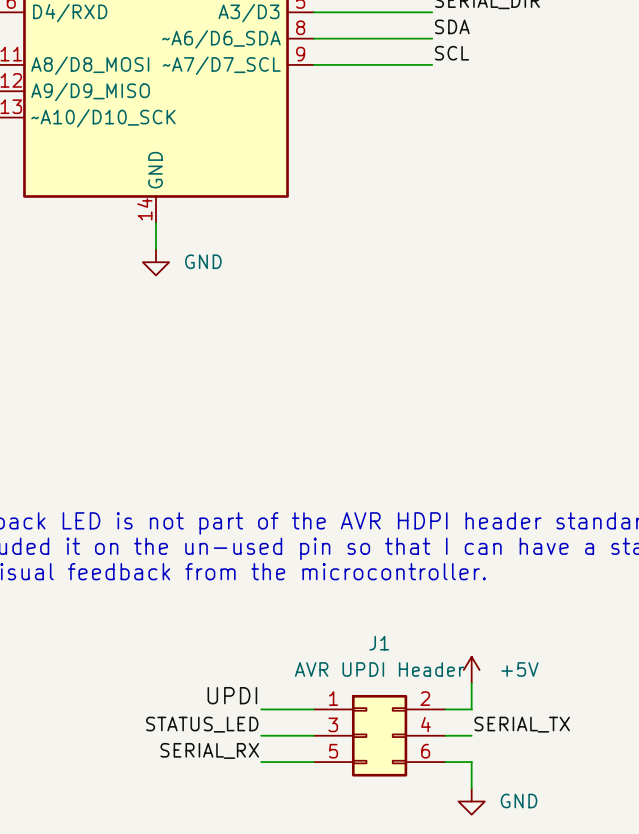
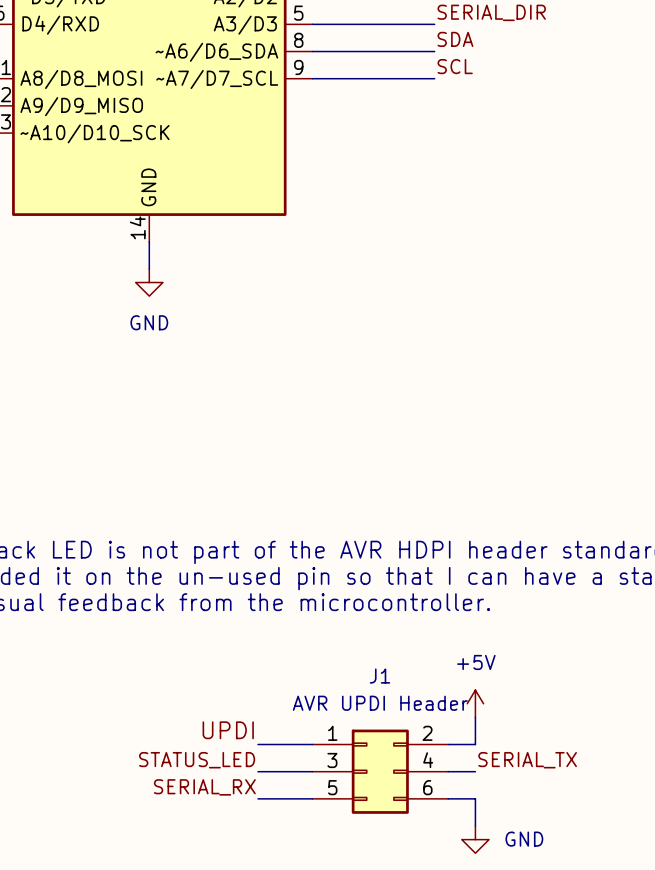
power symbol text position: GND (203, 261) -> GND (149, 322)
power symbol text position: +5V (519, 669) -> +5V (476, 662)

